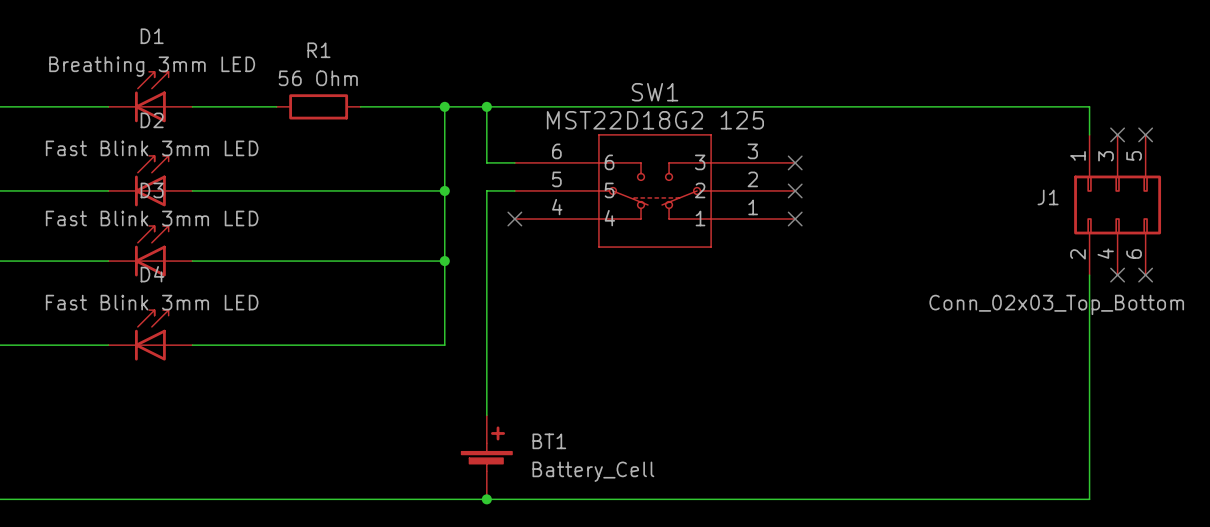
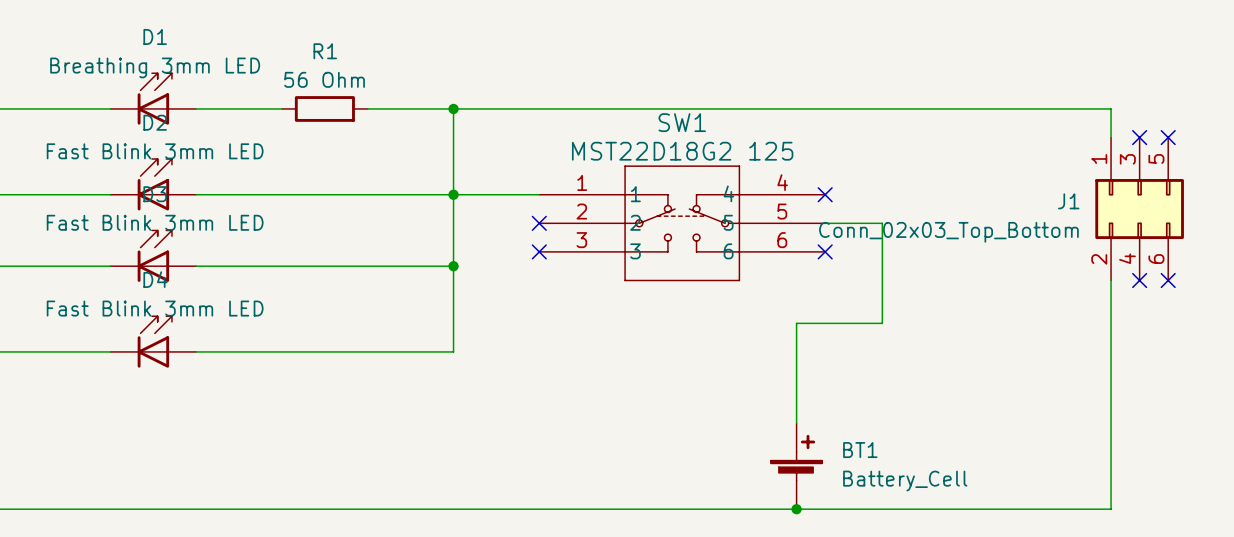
wire: (486, 106) (486, 162) (514, 162) -> none
junction: (486, 106) -> none
SW1 symbol: [514, 134, 796, 248] -> [539, 165, 826, 282]
no-connect mark: (795, 162) -> none
wire: (486, 190) (486, 415) -> (496, 194) (453, 194)
no-connect mark position: (795, 190) -> (825, 194)
no-connect mark position: (514, 219) -> (539, 223)
no-connect mark: (795, 219) -> none
wire: none -> (825, 223) (882, 223) (882, 323) (796, 323) (796, 423)
no-connect mark: none -> (539, 251)
no-connect mark: none -> (825, 251)
J1 value position: Conn_02x03_Top_Bottom (1056, 304) -> Conn_02x03_Top_Bottom (948, 232)
BT1 position: (486, 457) -> (796, 466)
junction: (486, 499) -> none
junction: none -> (796, 509)

